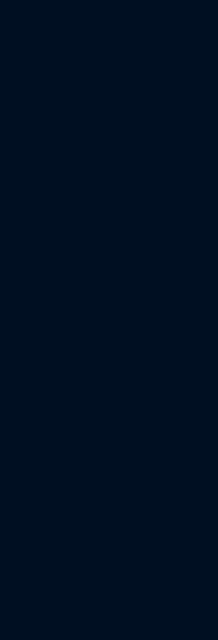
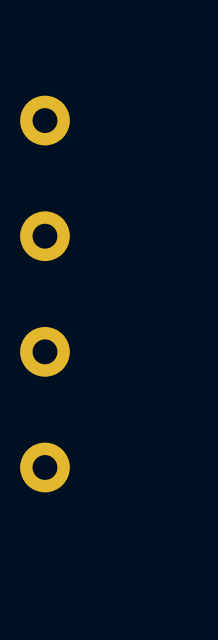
part: none -> (44, 120)
part: none -> (44, 236)
part: none -> (44, 351)
part: none -> (44, 467)

